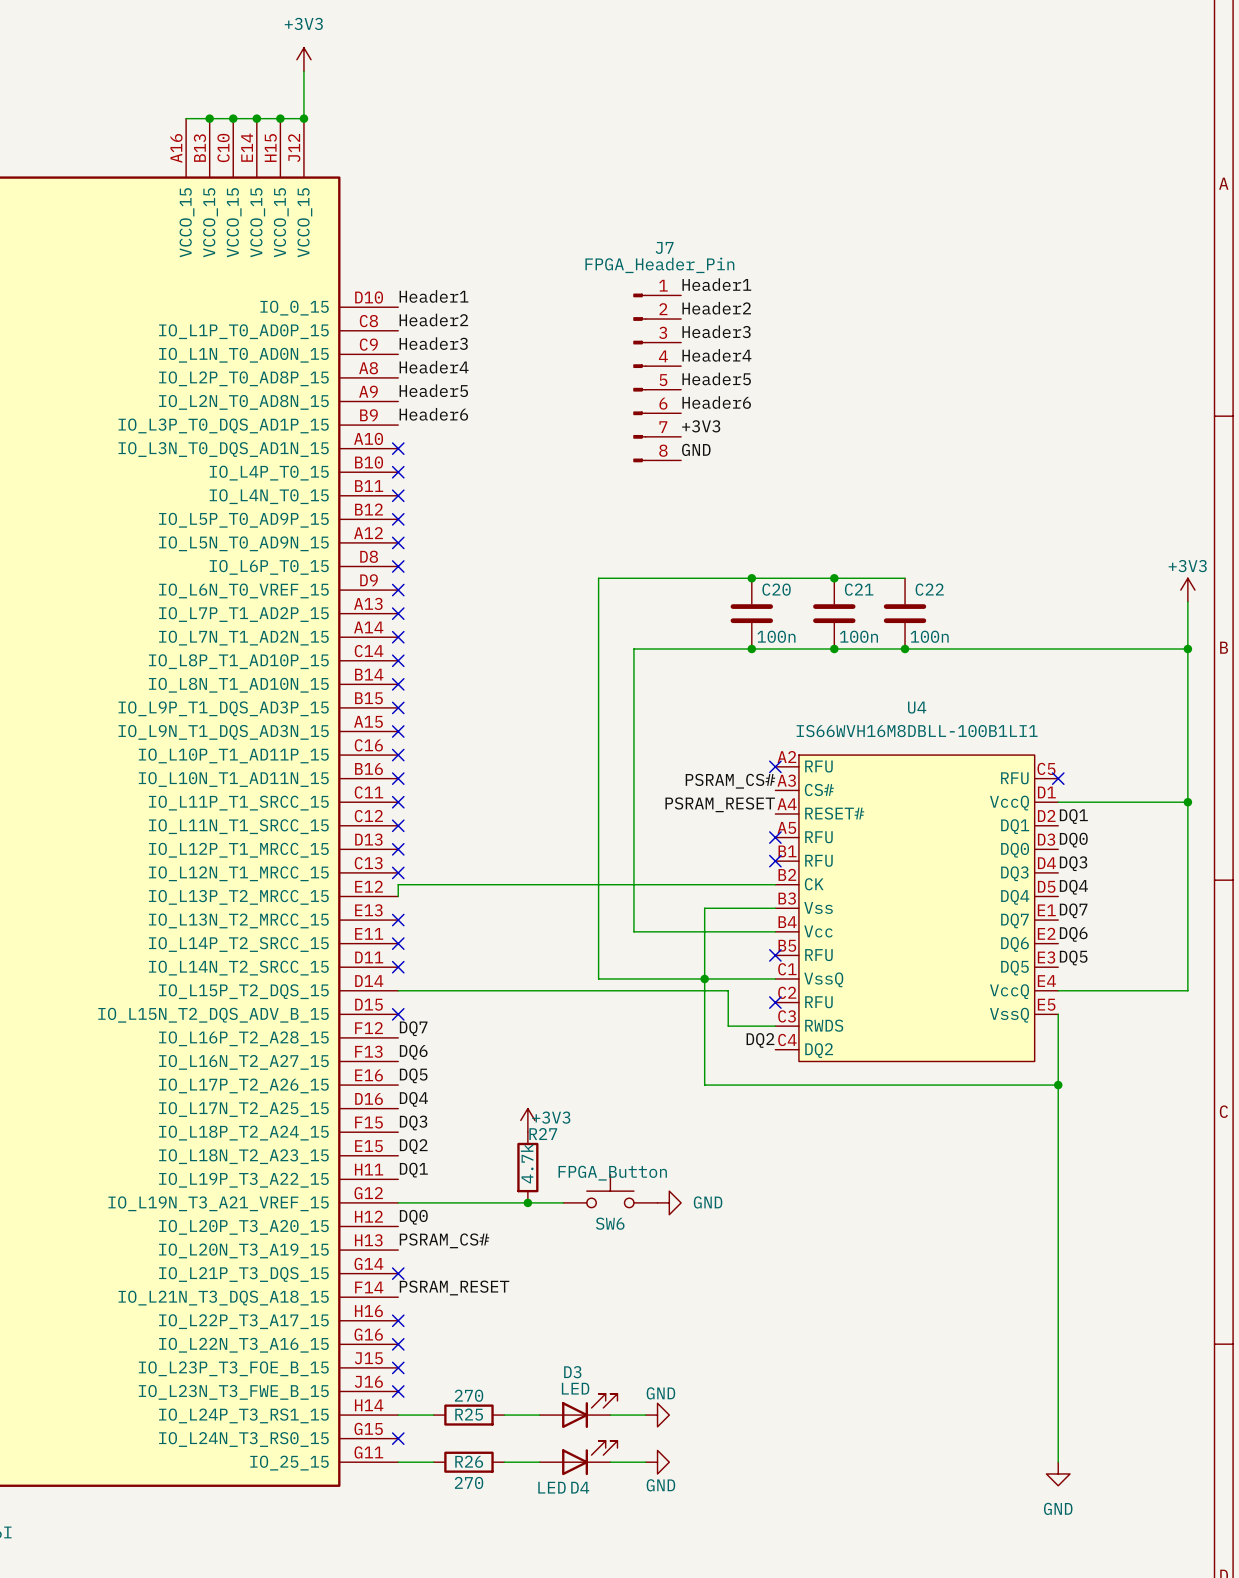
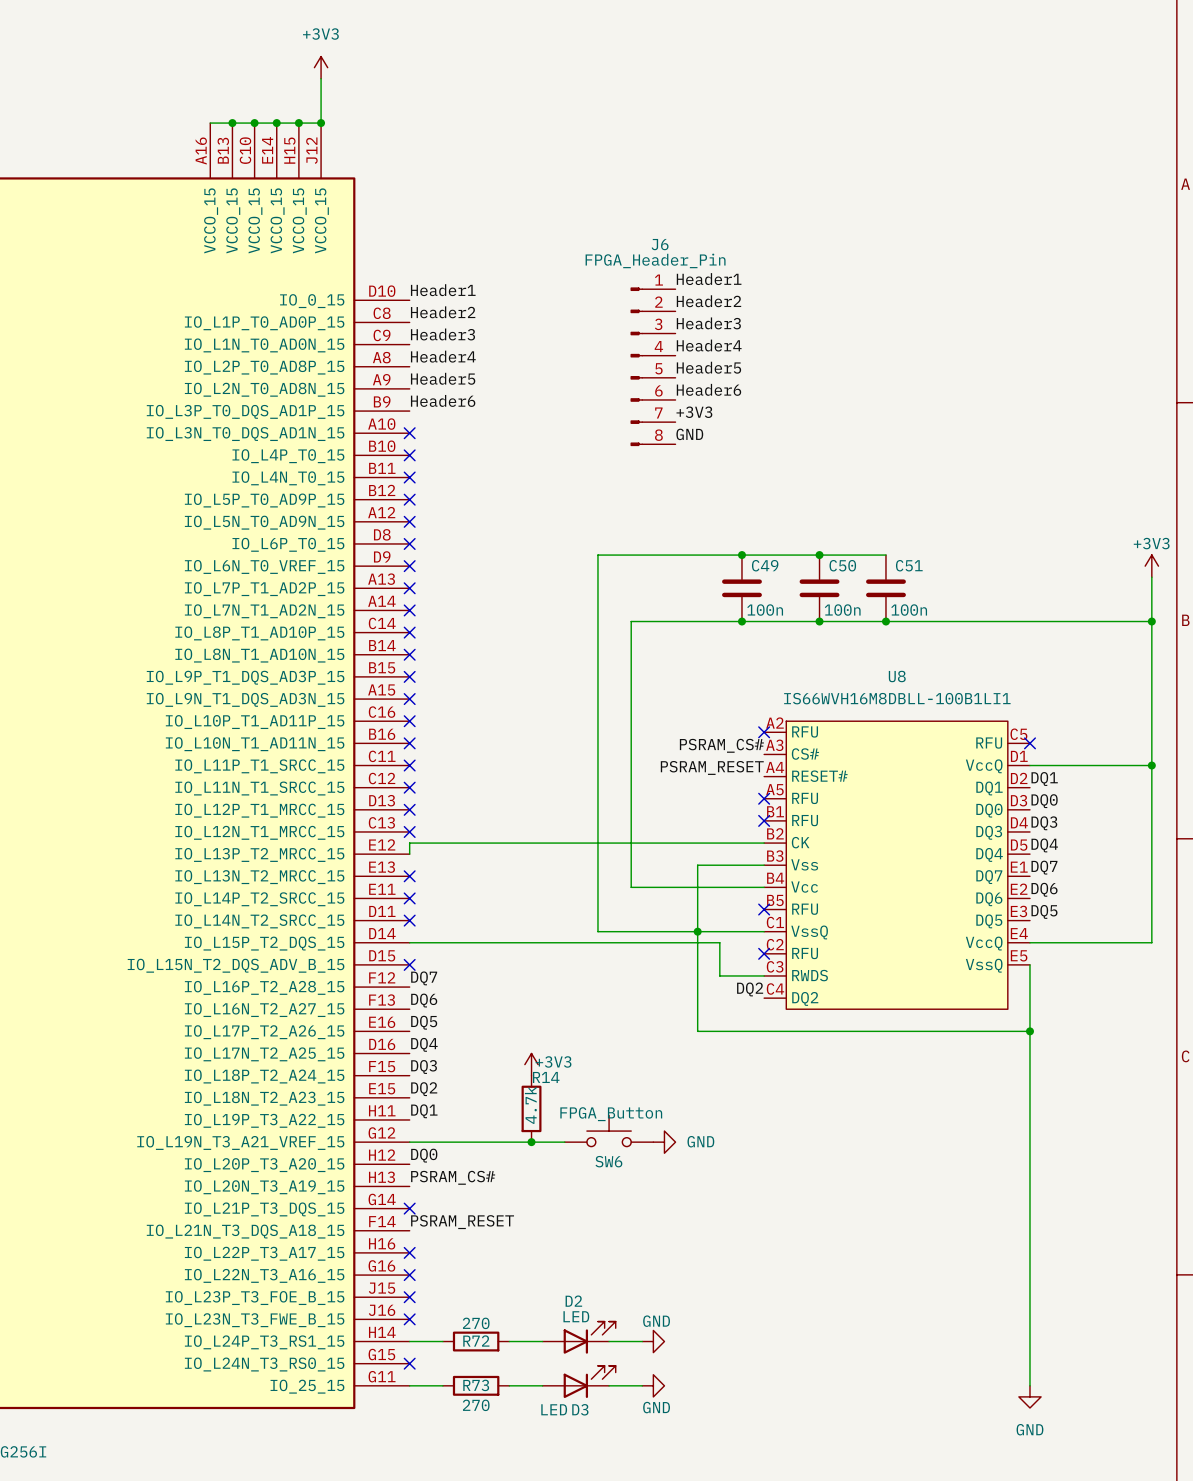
J7 name: J7 (664, 247) -> J6 (660, 244)
C20 name: C20 (776, 589) -> C49 (765, 565)
C21 name: C21 (859, 589) -> C50 (842, 565)
C22 name: C22 (929, 589) -> C51 (909, 565)
U4 name: U4 (917, 707) -> U8 (897, 676)
R27 name: R27 (543, 1134) -> R14 (546, 1077)
D3 name: D3 (572, 1372) -> D2 (573, 1301)
R25 name: R25 (469, 1414) -> R72 (476, 1341)
R26 name: R26 (469, 1461) -> R73 (476, 1385)
D4 name: D4 (580, 1487) -> D3 (580, 1409)

